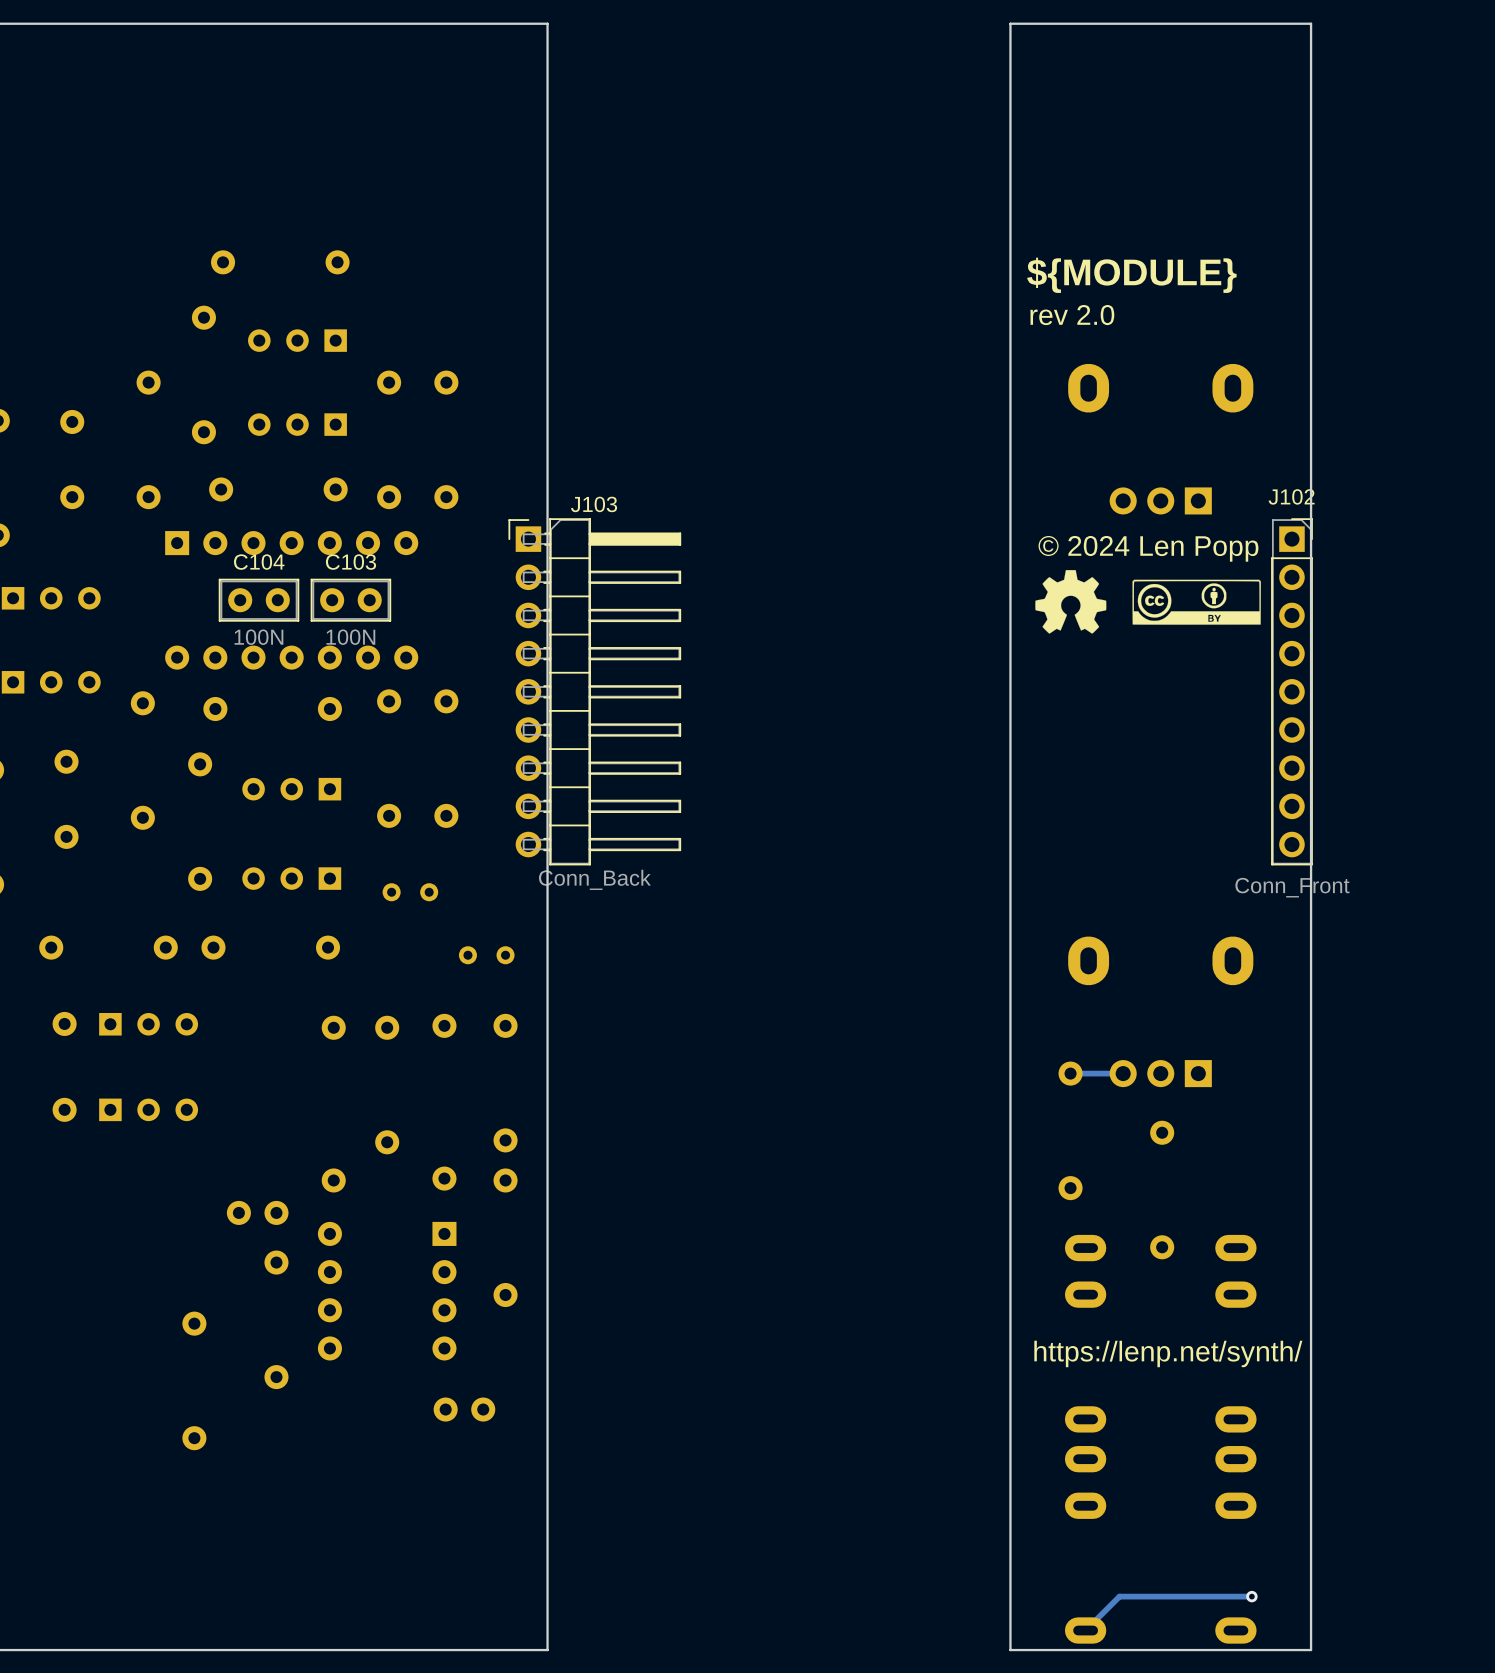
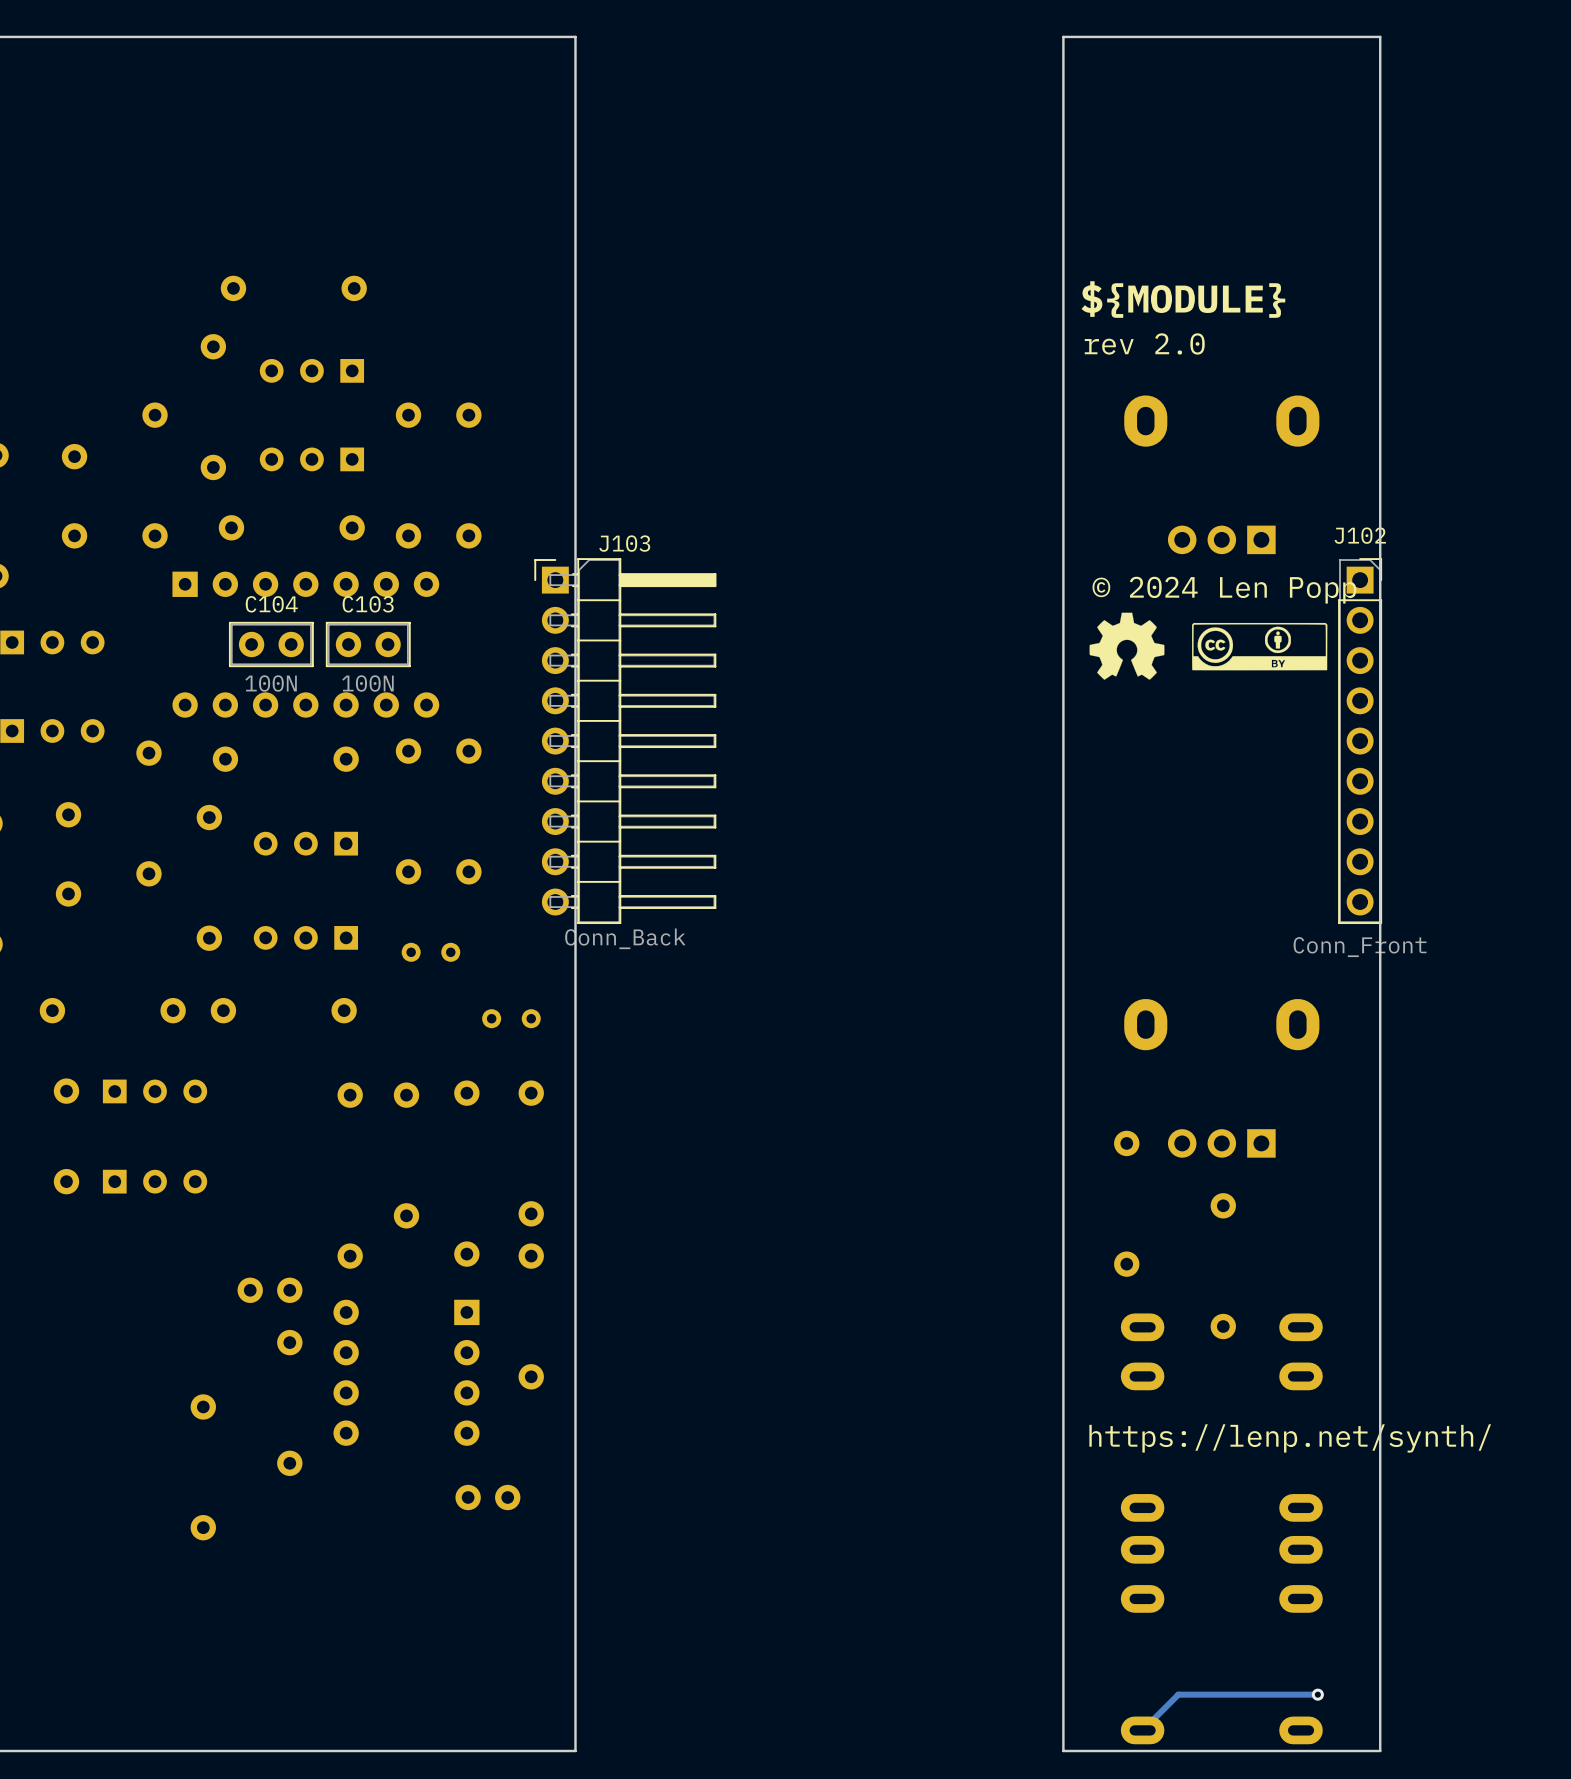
track: (1123, 1073) (1070, 1073) -> none

